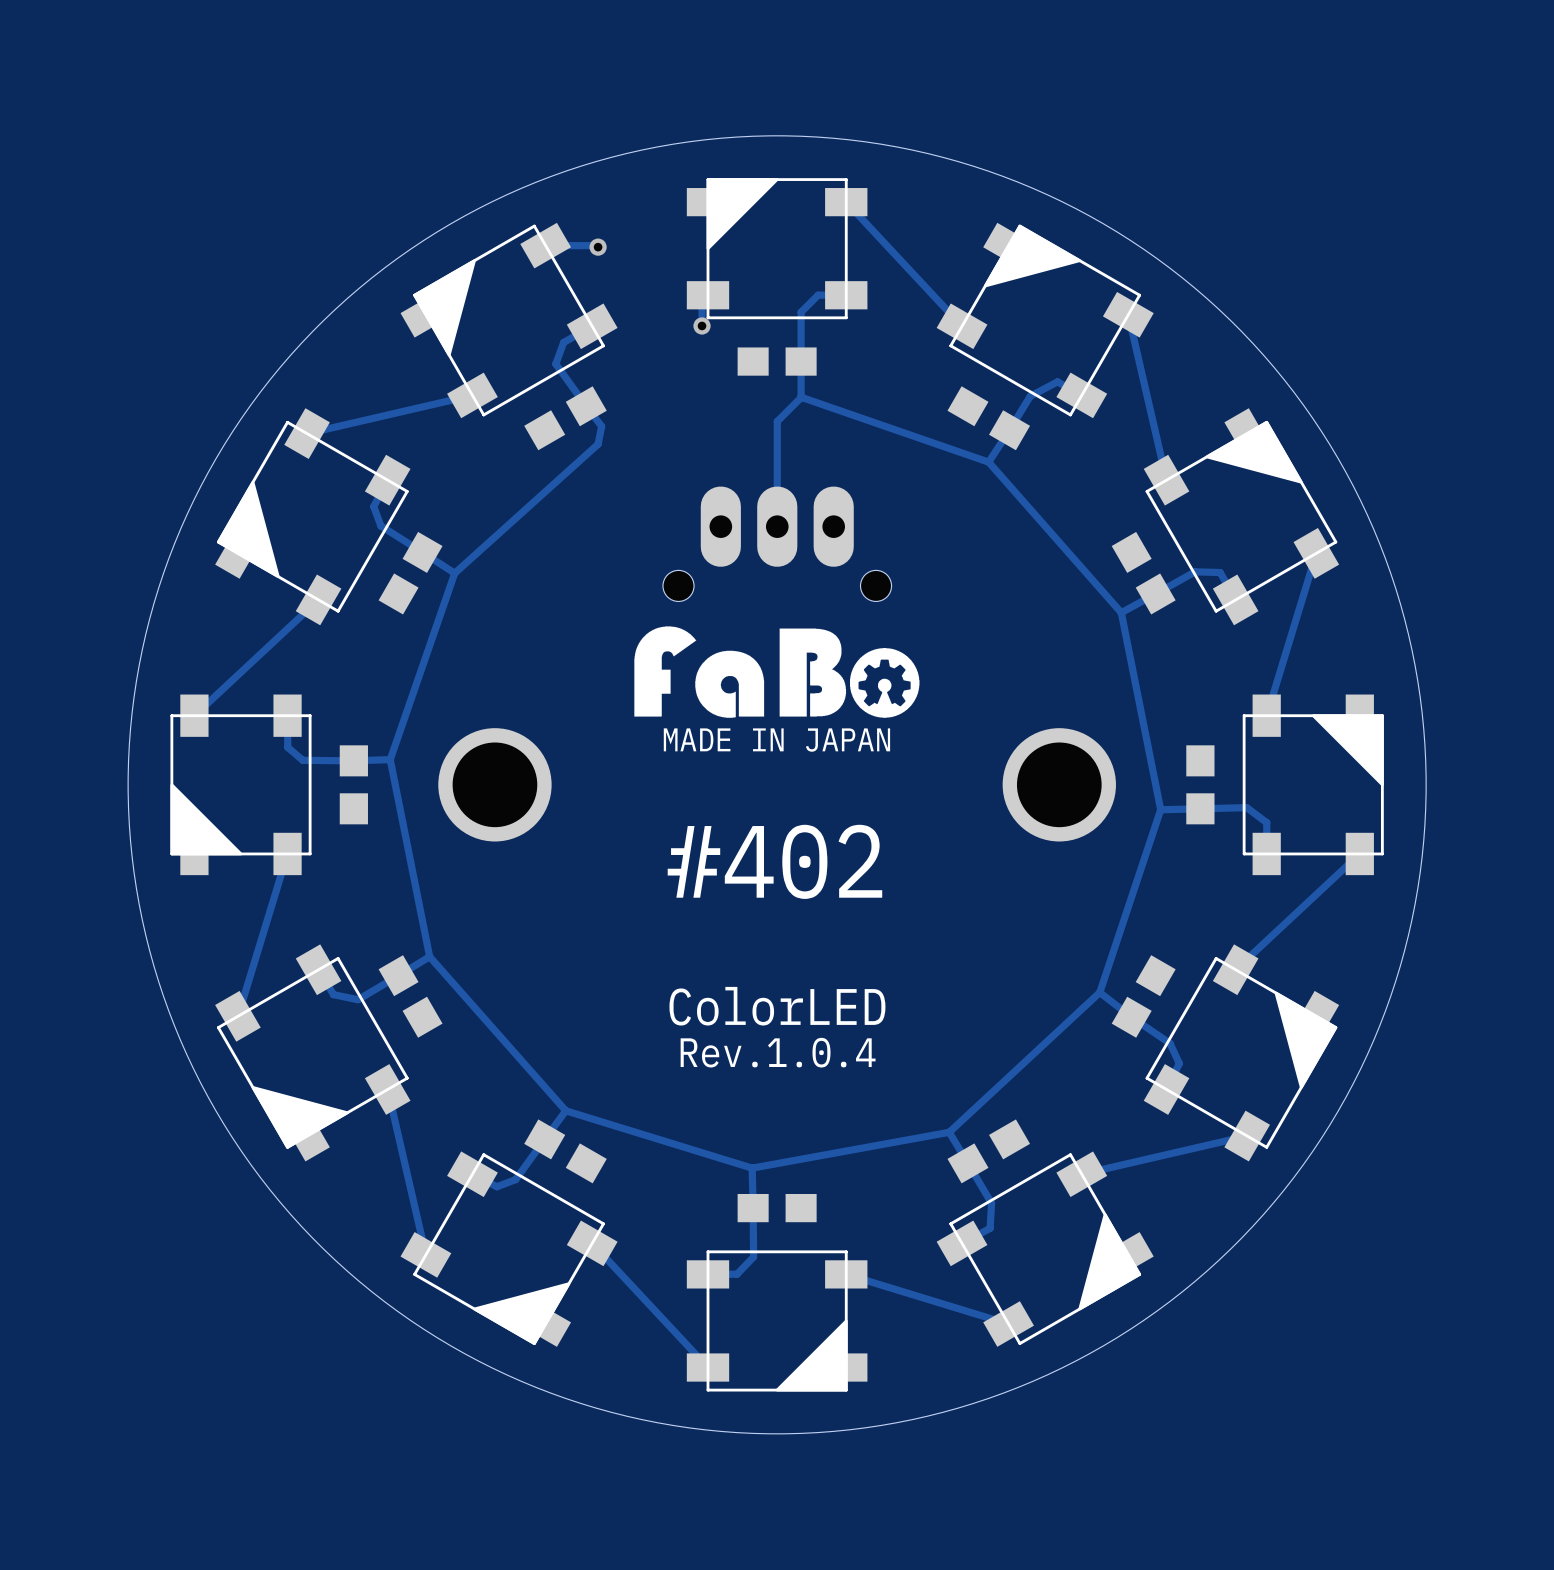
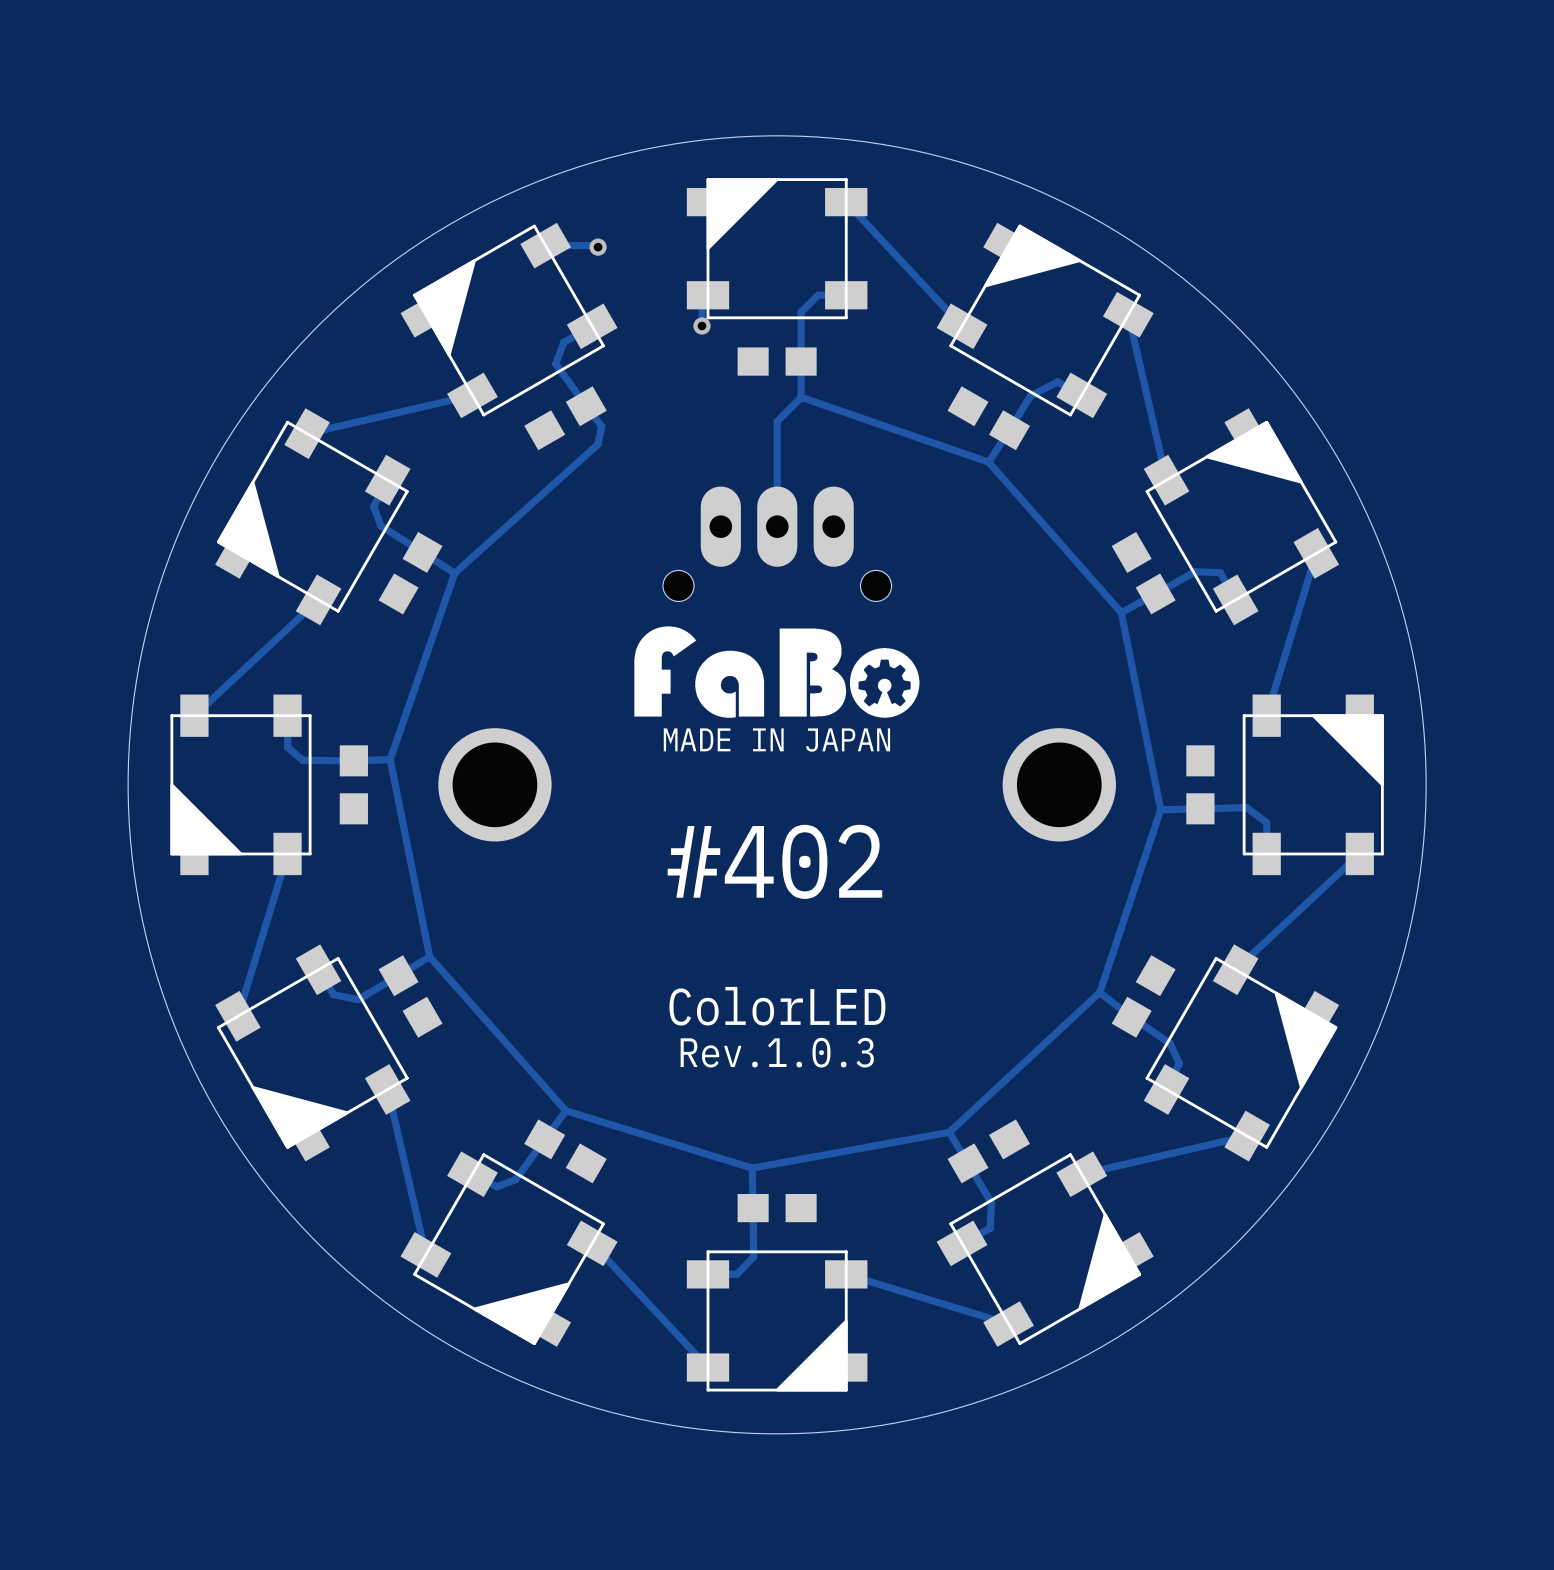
text: Rev.1.0.4 (778, 1052) -> Rev.1.0.3 (777, 1052)

